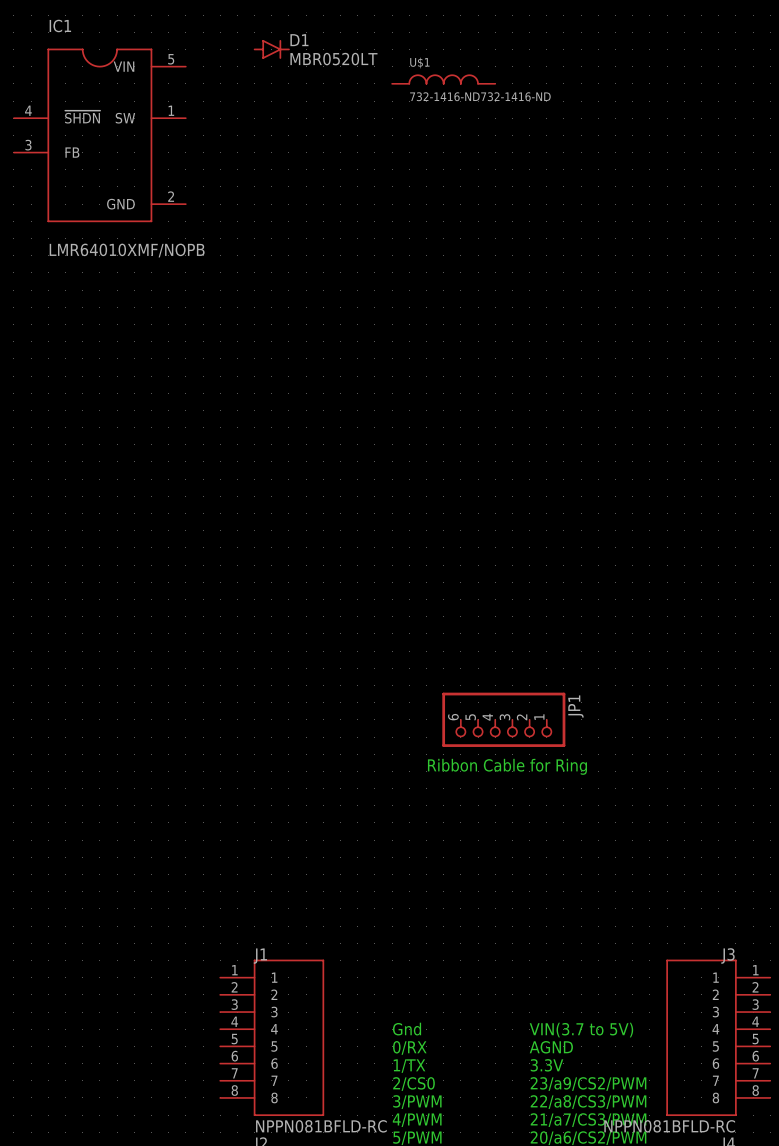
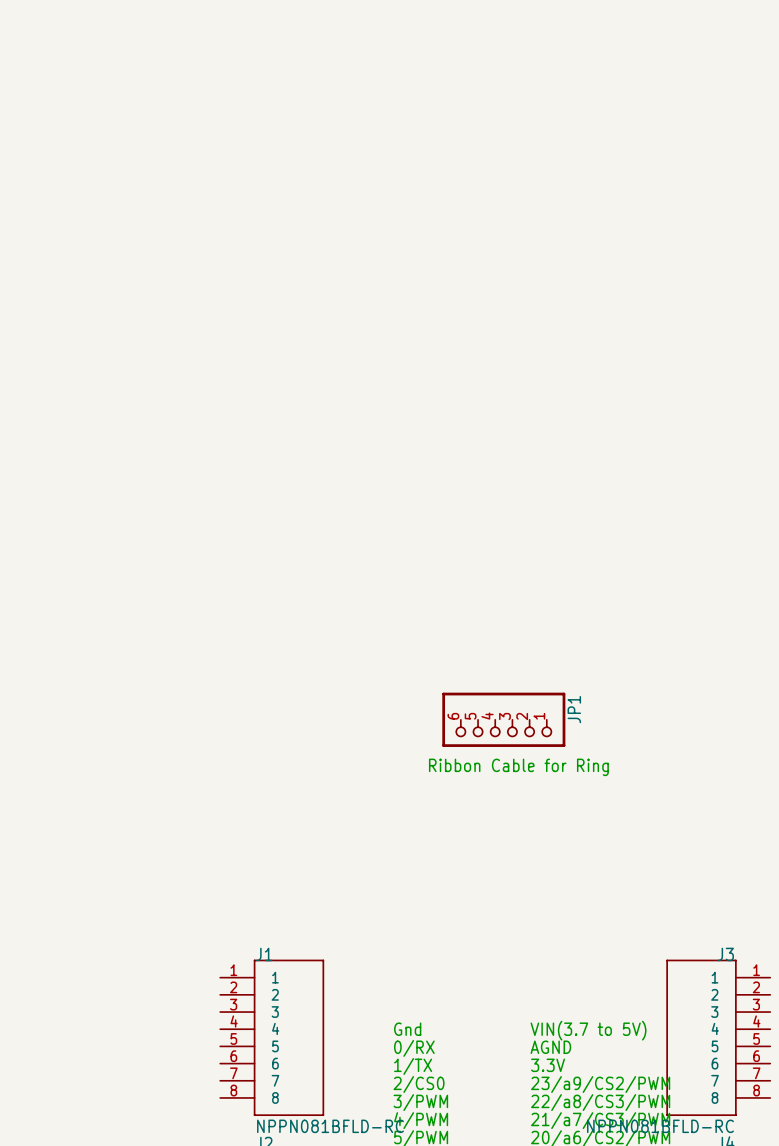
D1: MBR0520LT (271, 49) -> none
U$1: 732-1416-ND732-1416-ND (443, 79) -> none
IC1: LMR64010XMF/NOPB (99, 135) -> none

